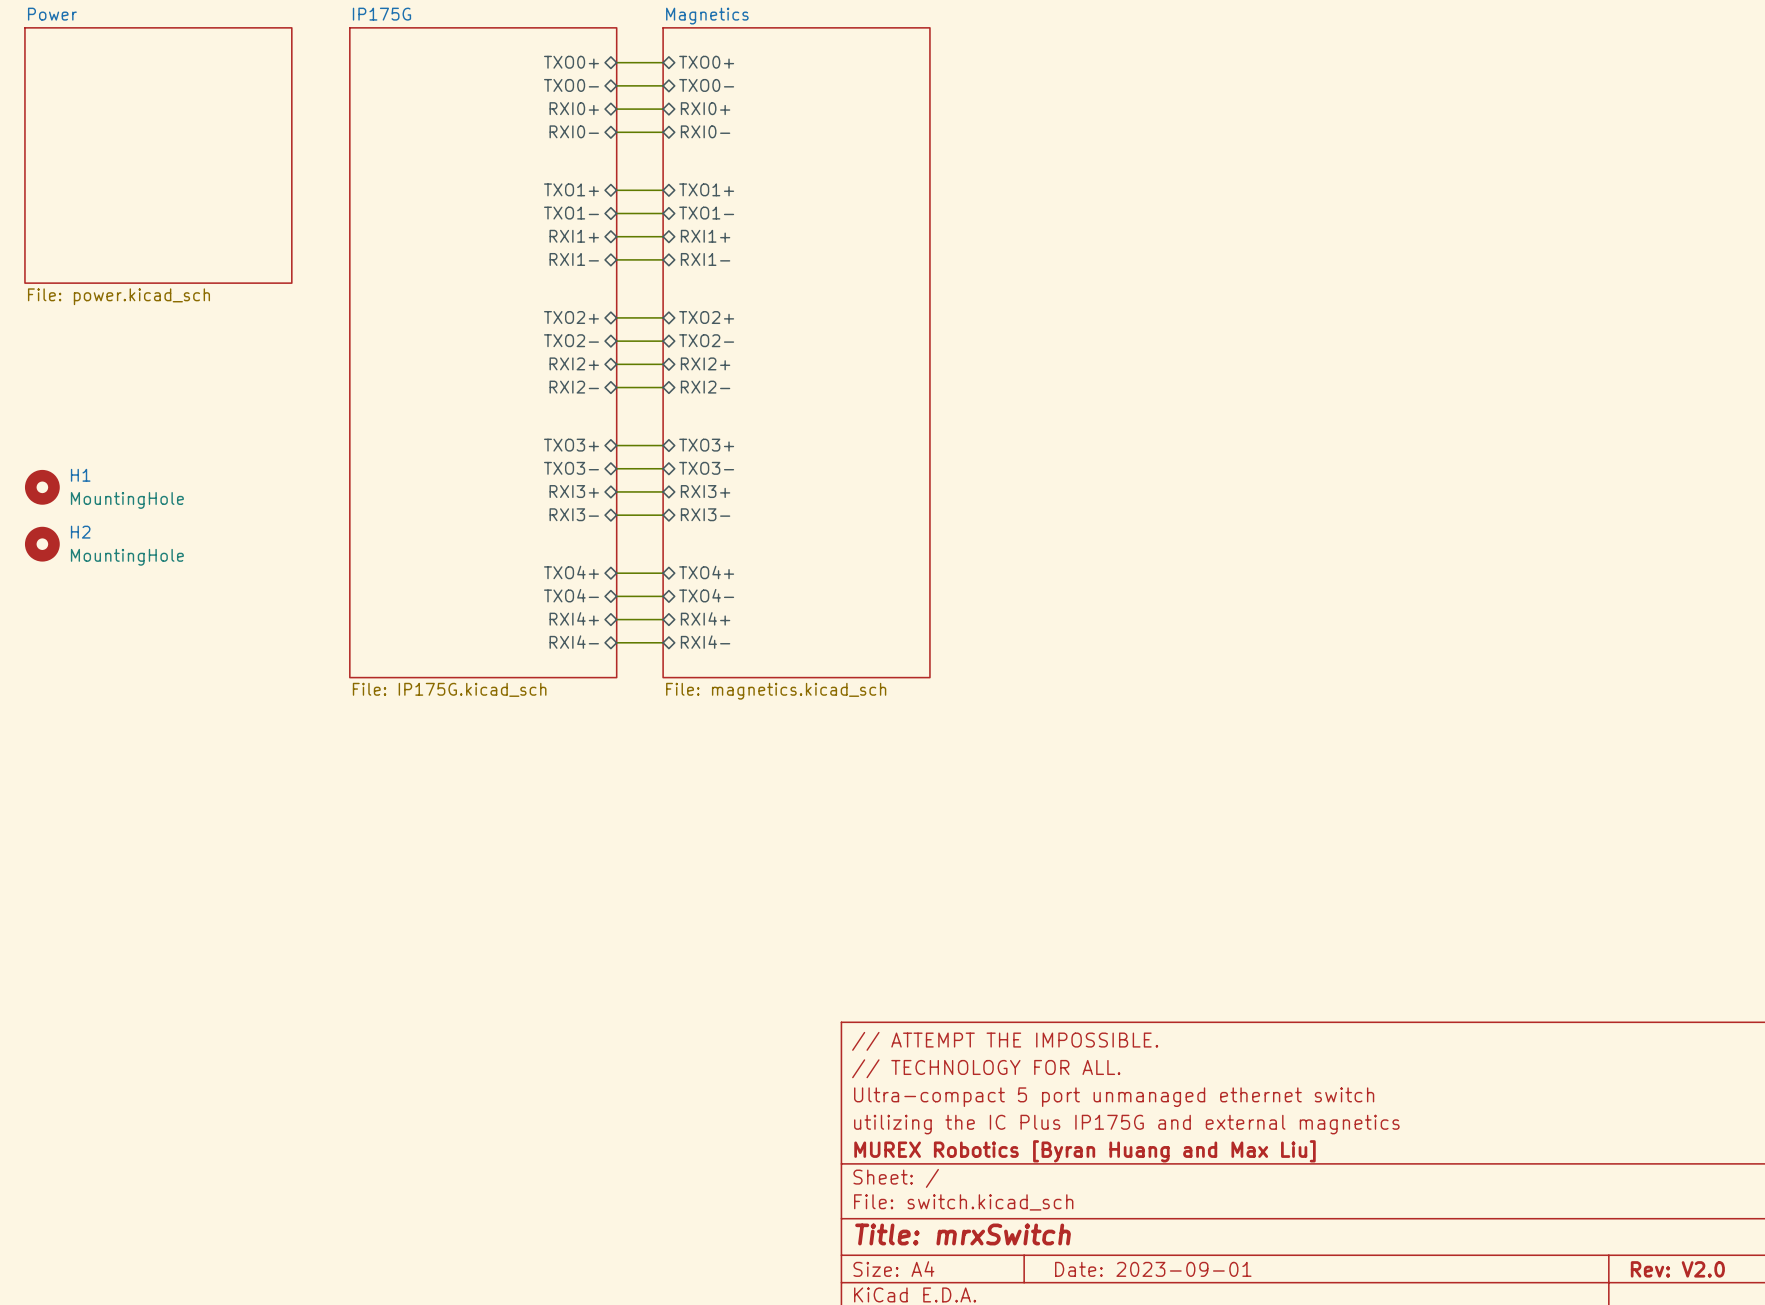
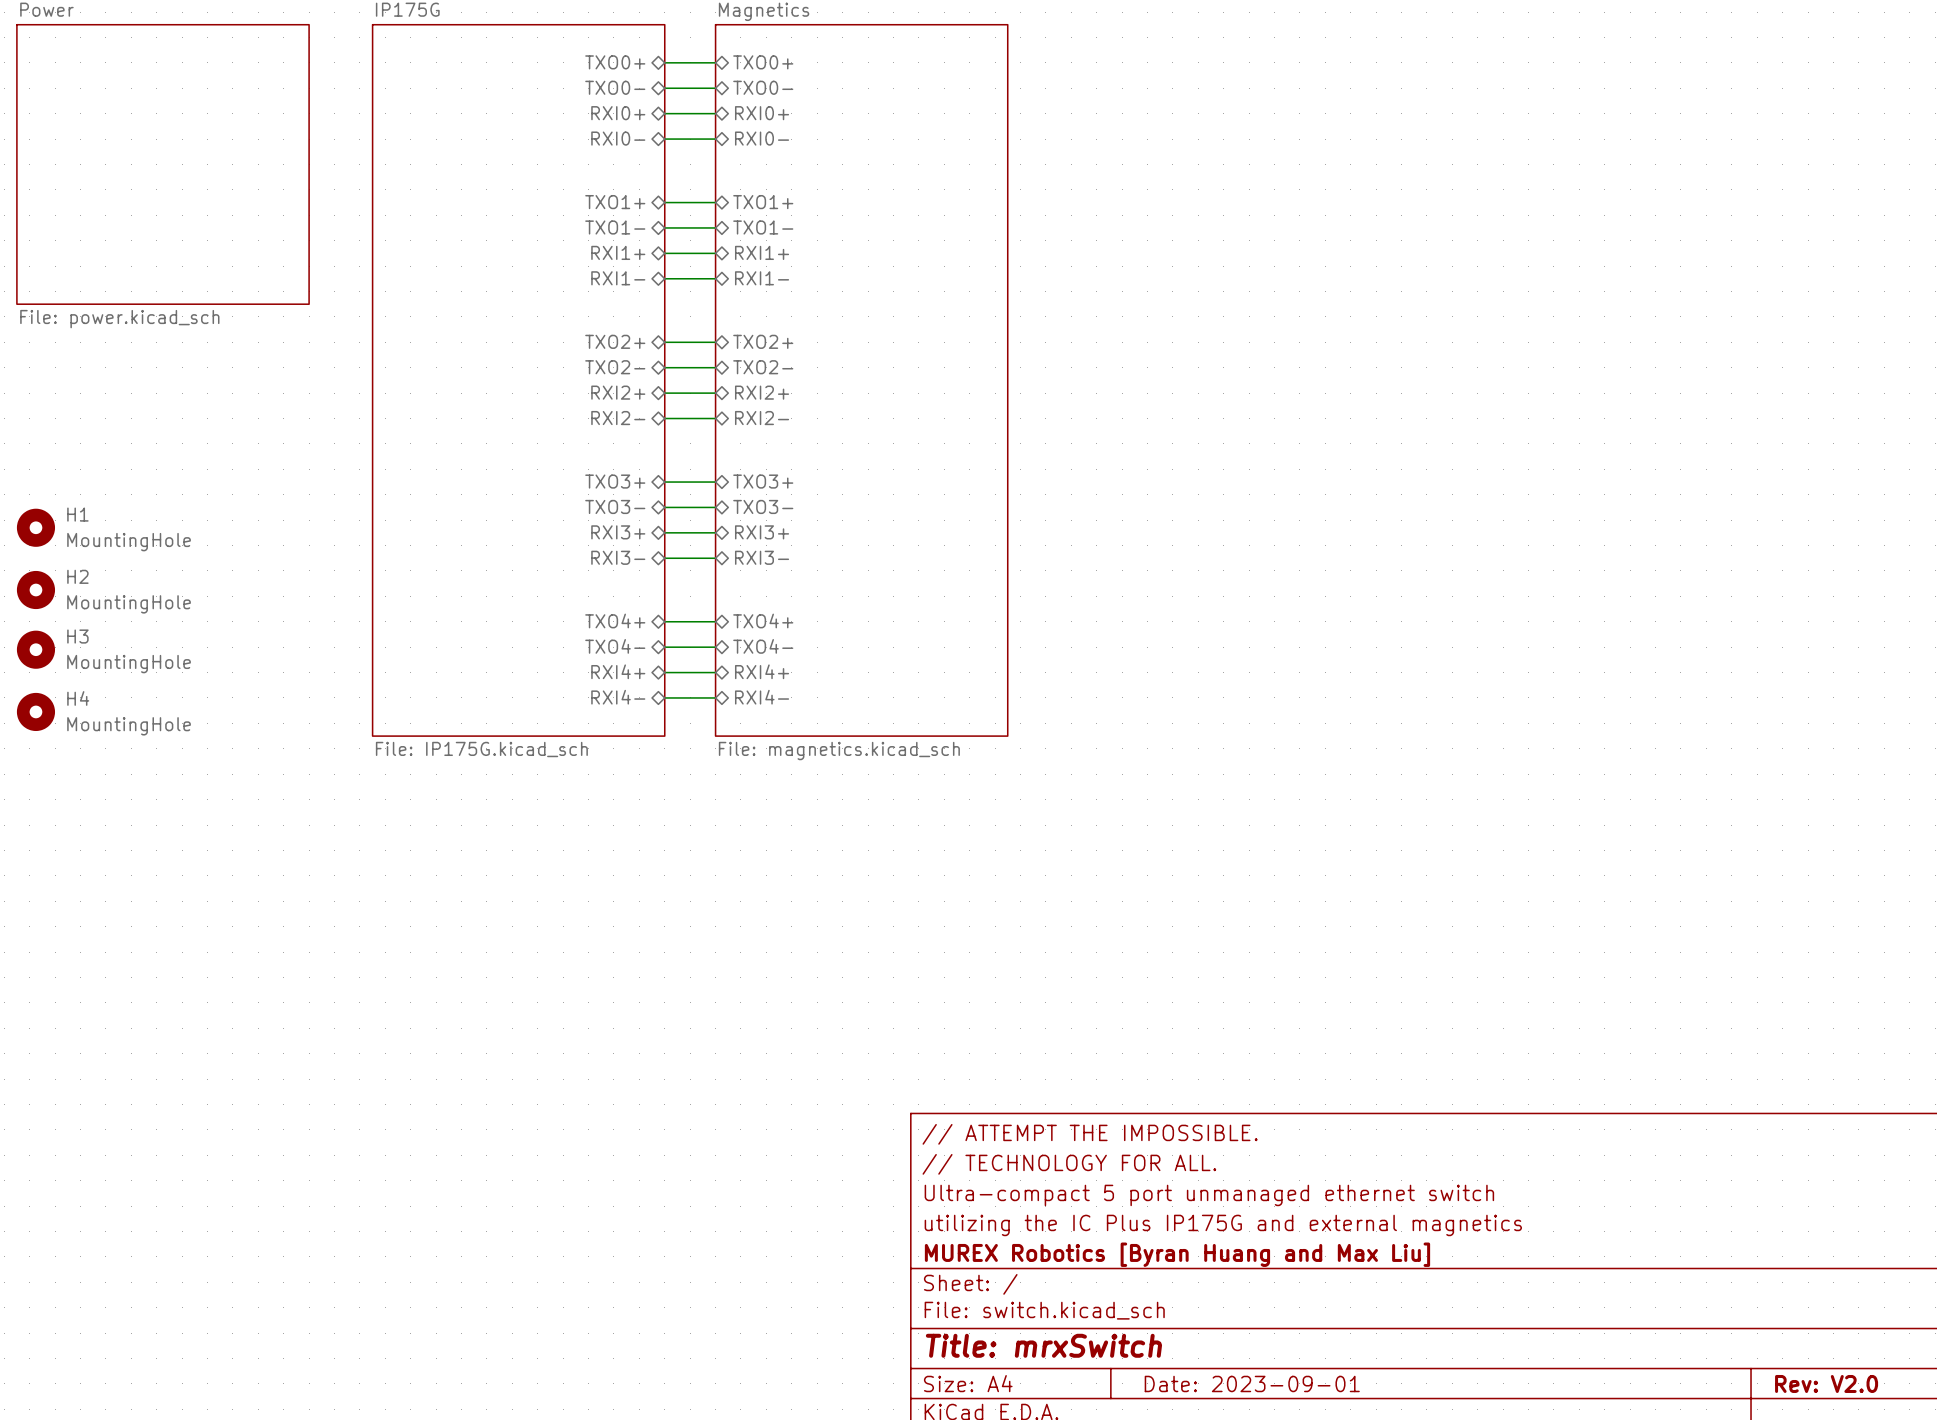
H3: none -> MountingHole (35, 649)
H4: none -> MountingHole (35, 711)

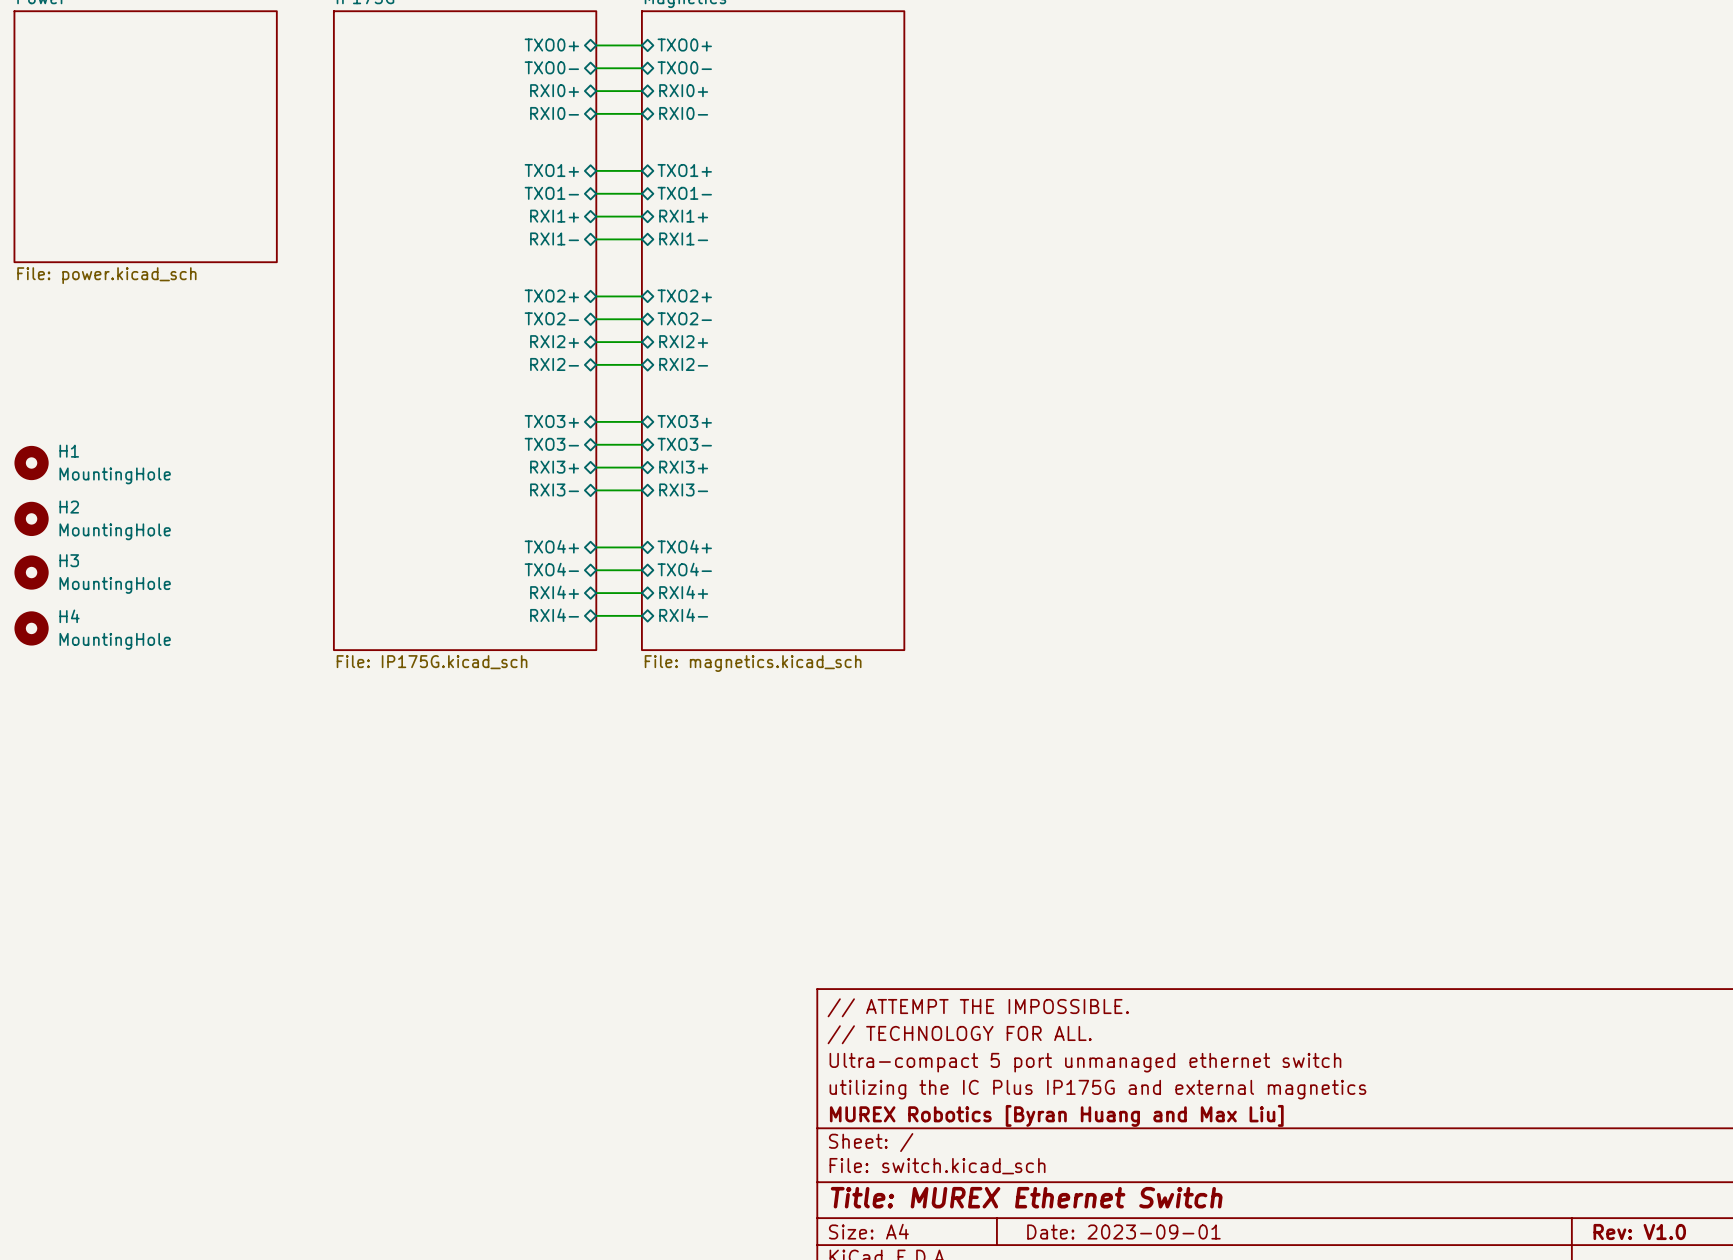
title block: Title: mrxSwitch (1043, 1345) -> Title: MUREX Ethernet Switch (1026, 1197)
title block: Rev: V2.0 (1826, 1383) -> Rev: V1.0 (1639, 1231)

